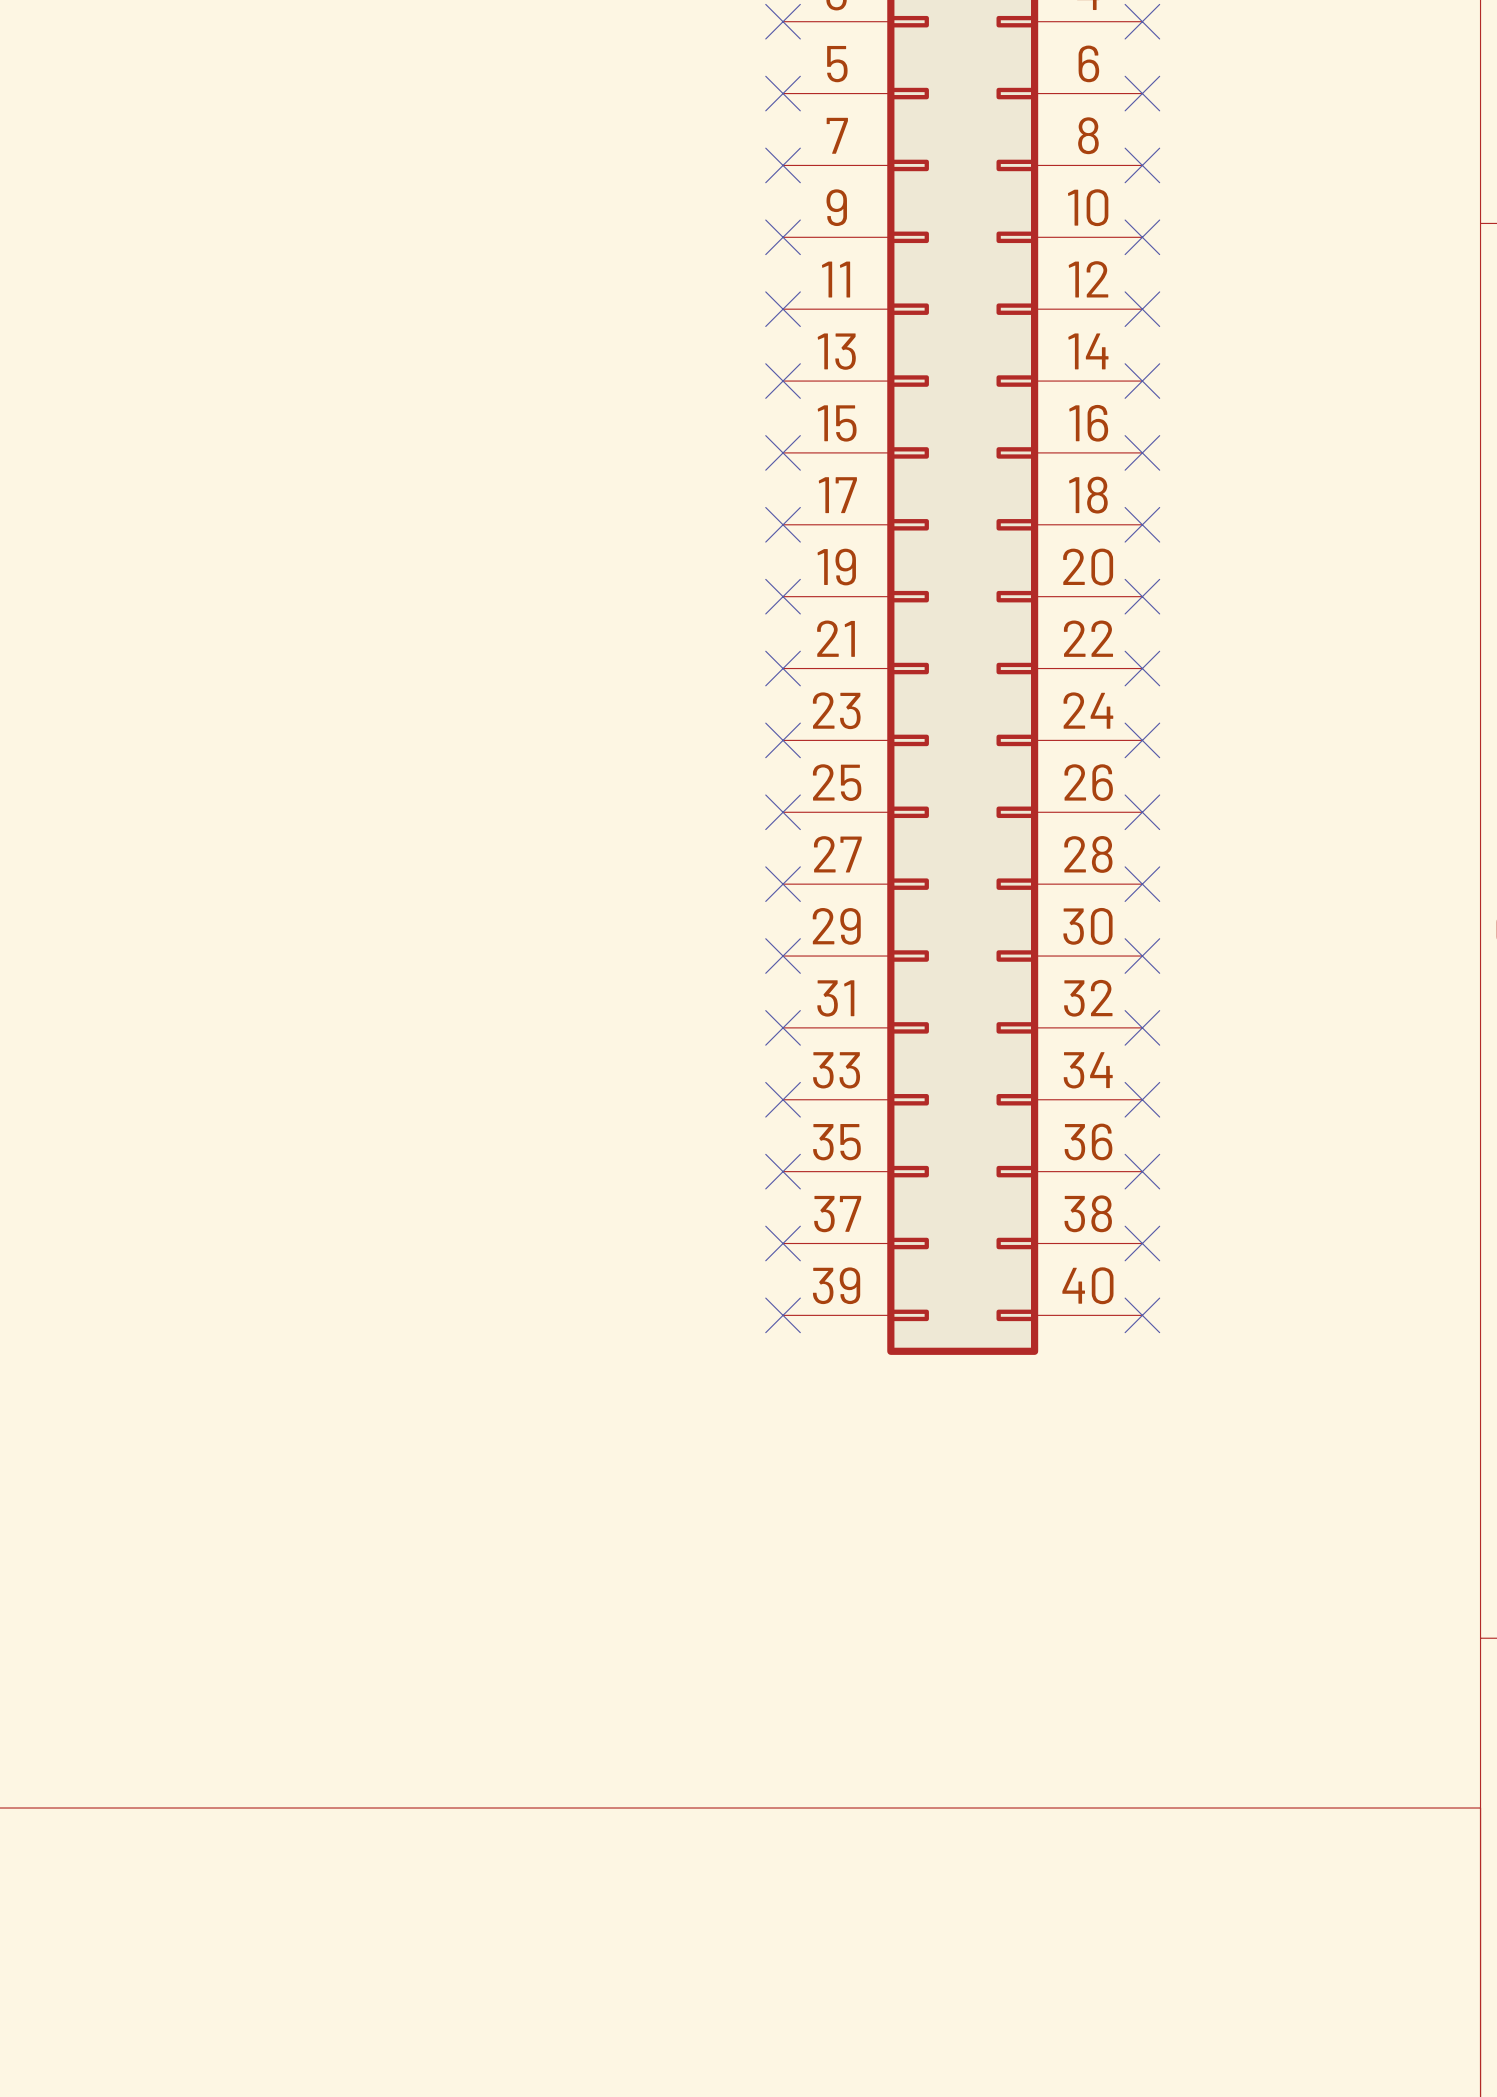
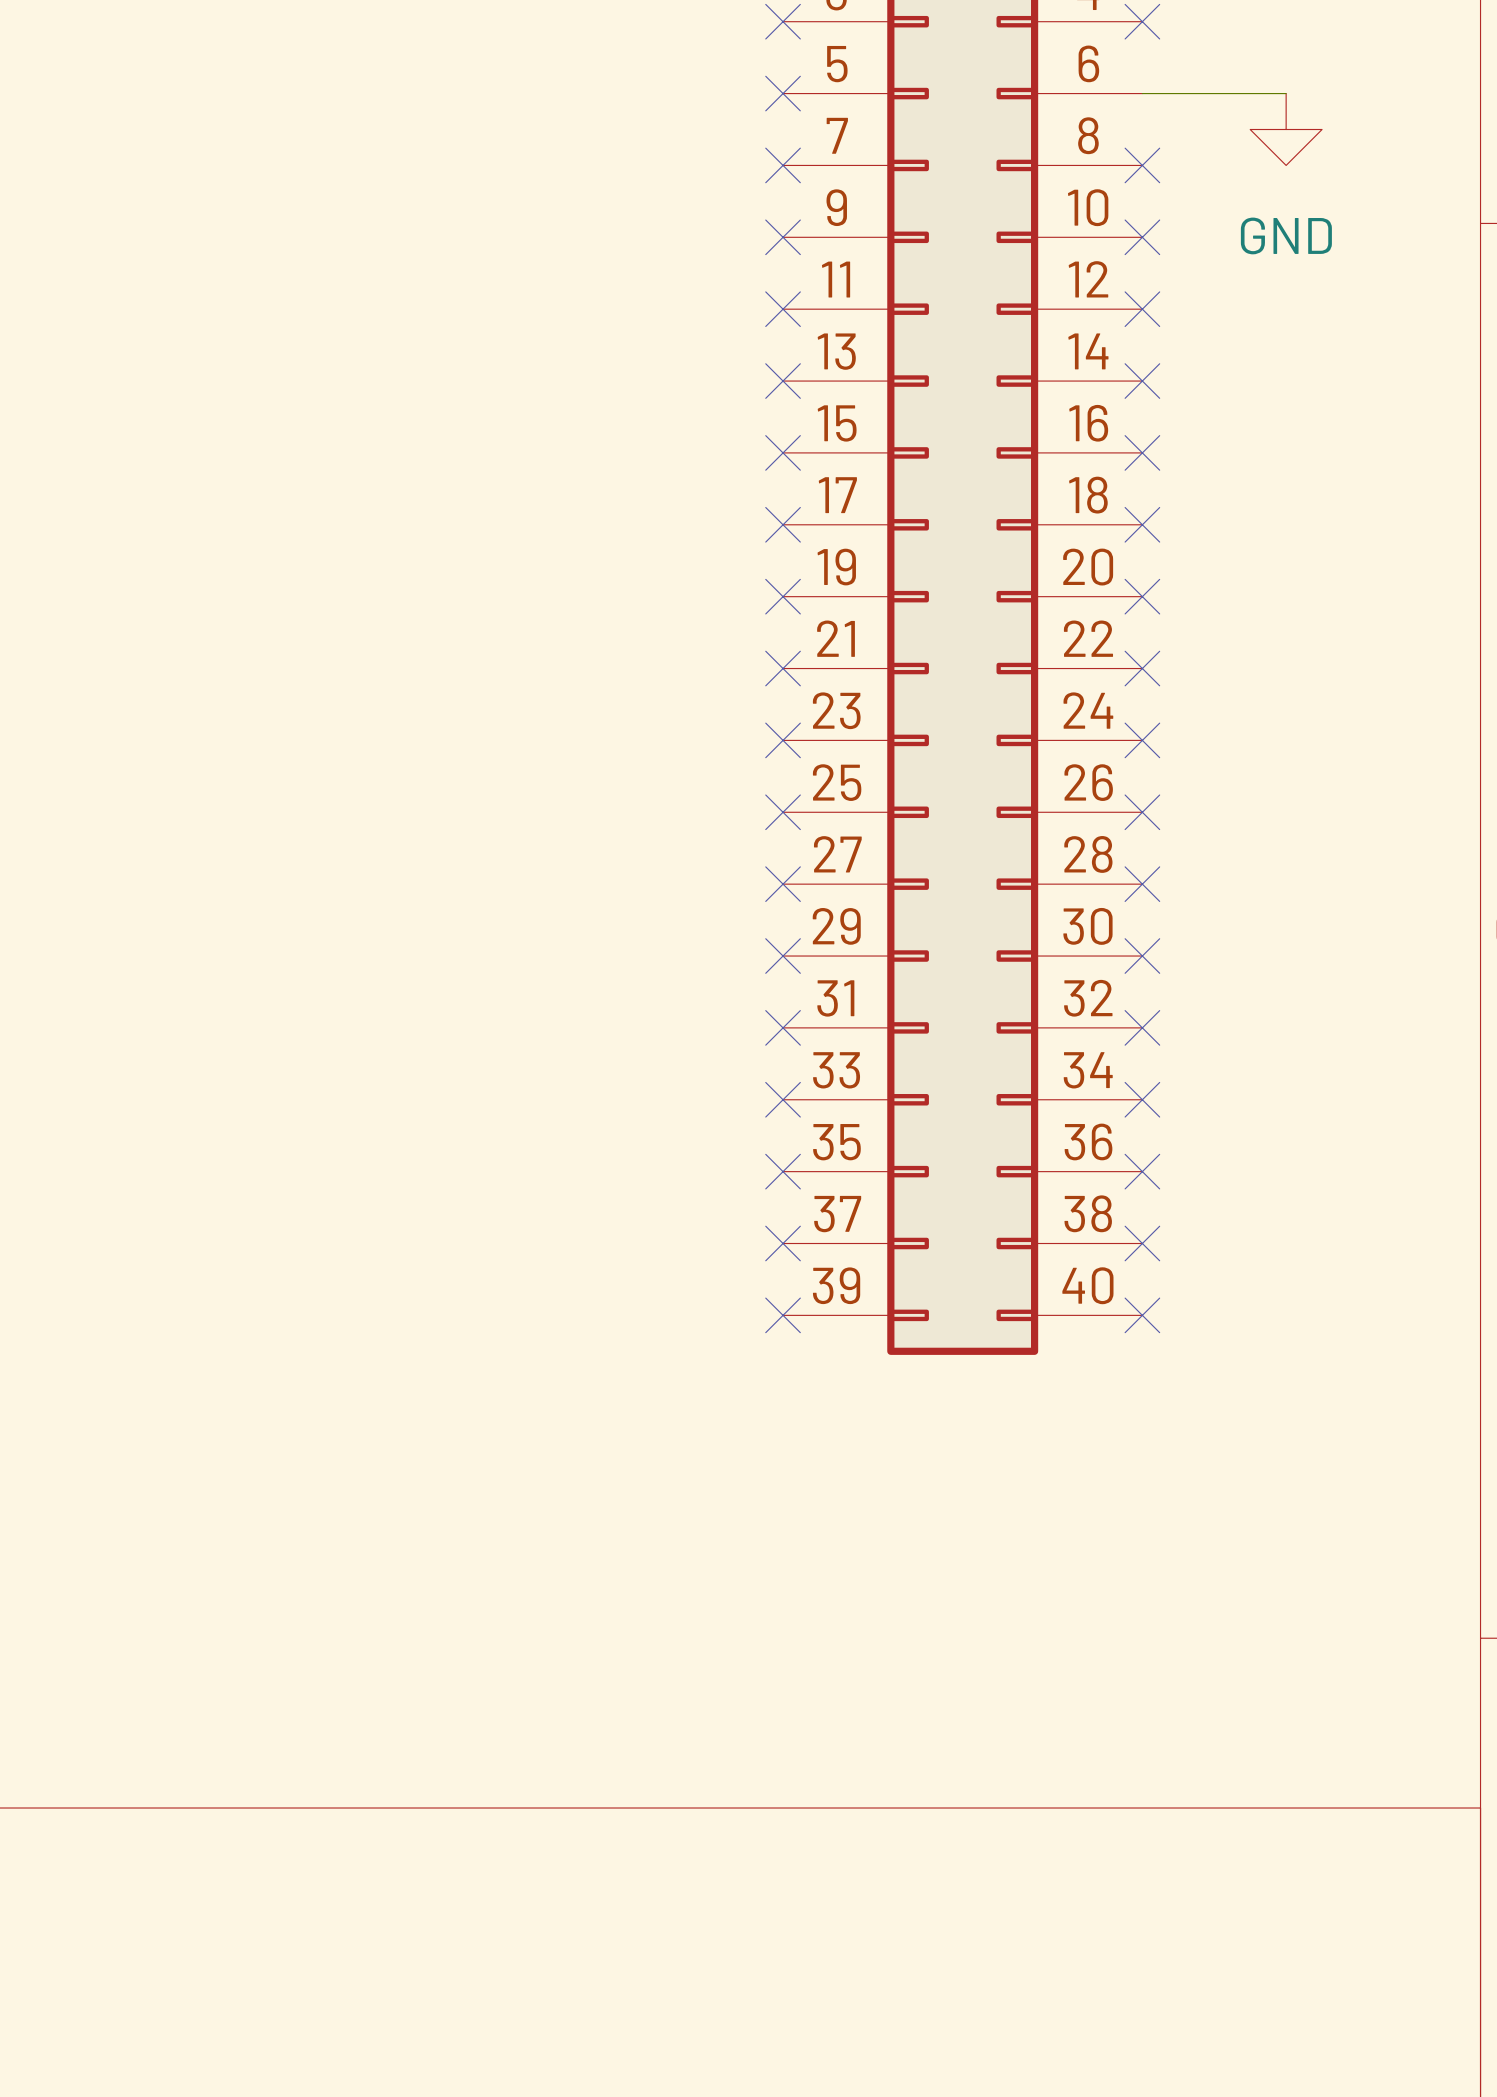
wire: none -> (1142, 93) (1286, 93)
no-connect mark: (1142, 93) -> none
power symbol: none -> GND (1286, 129)

